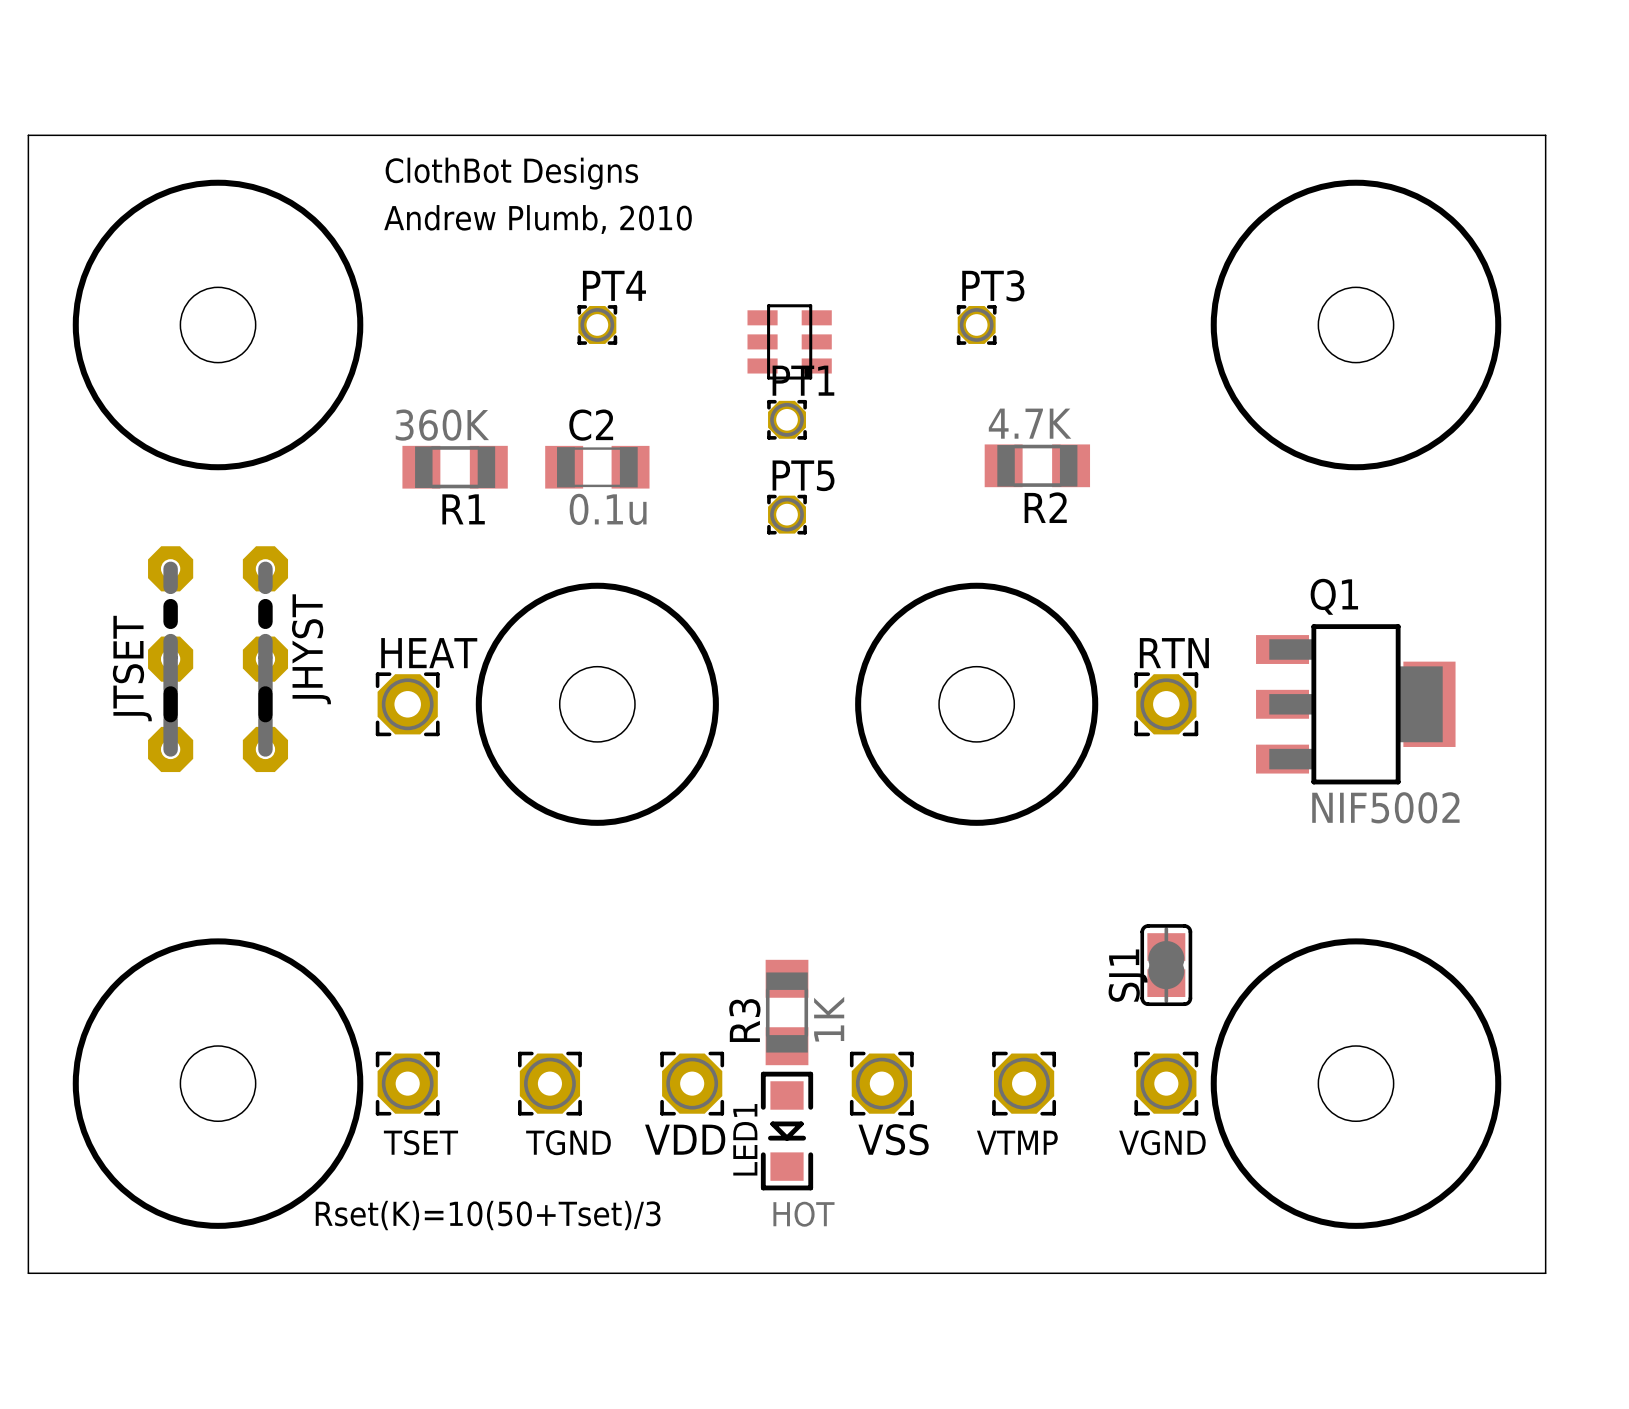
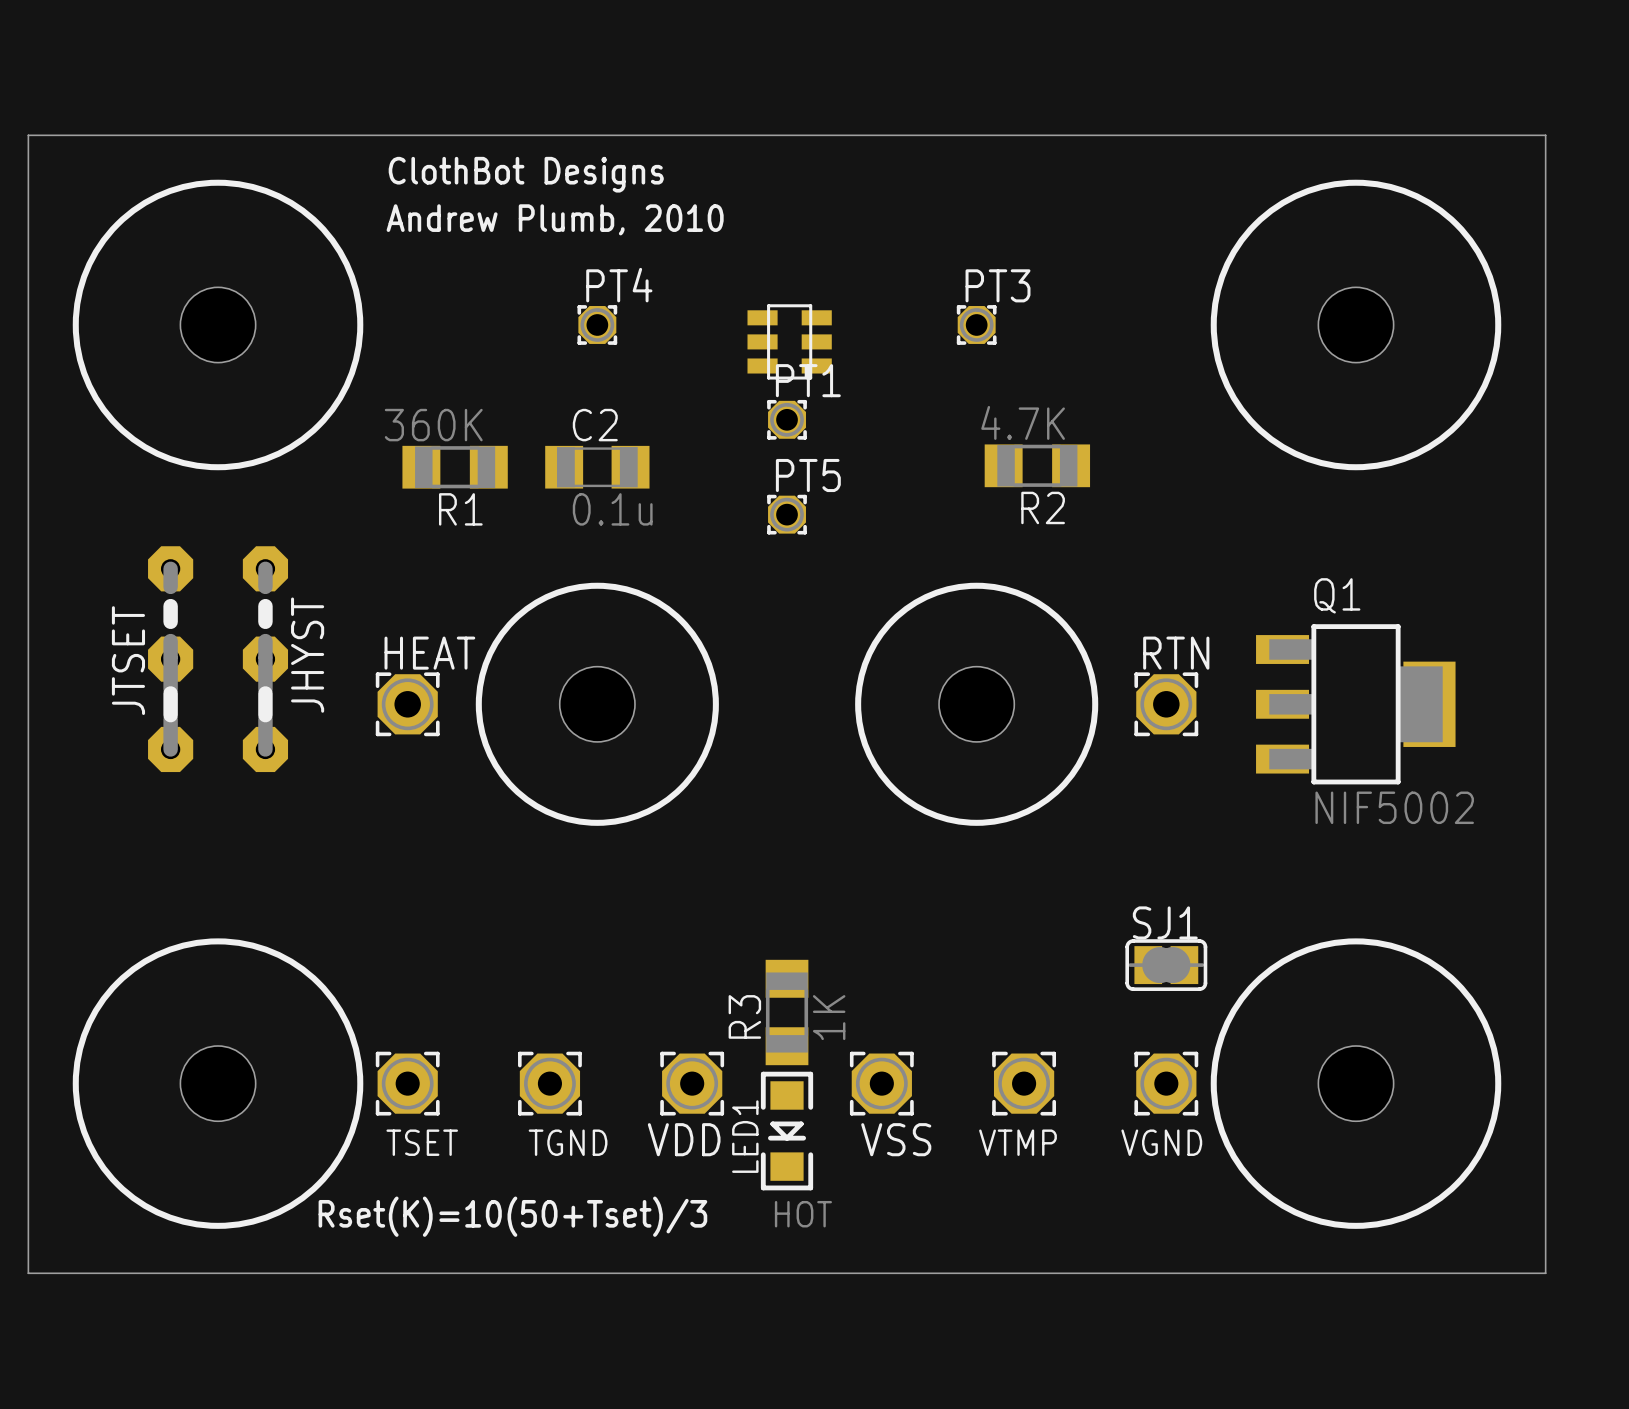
SJ1 rotation: 0° (1166, 965) -> 90° clockwise (1166, 965)

